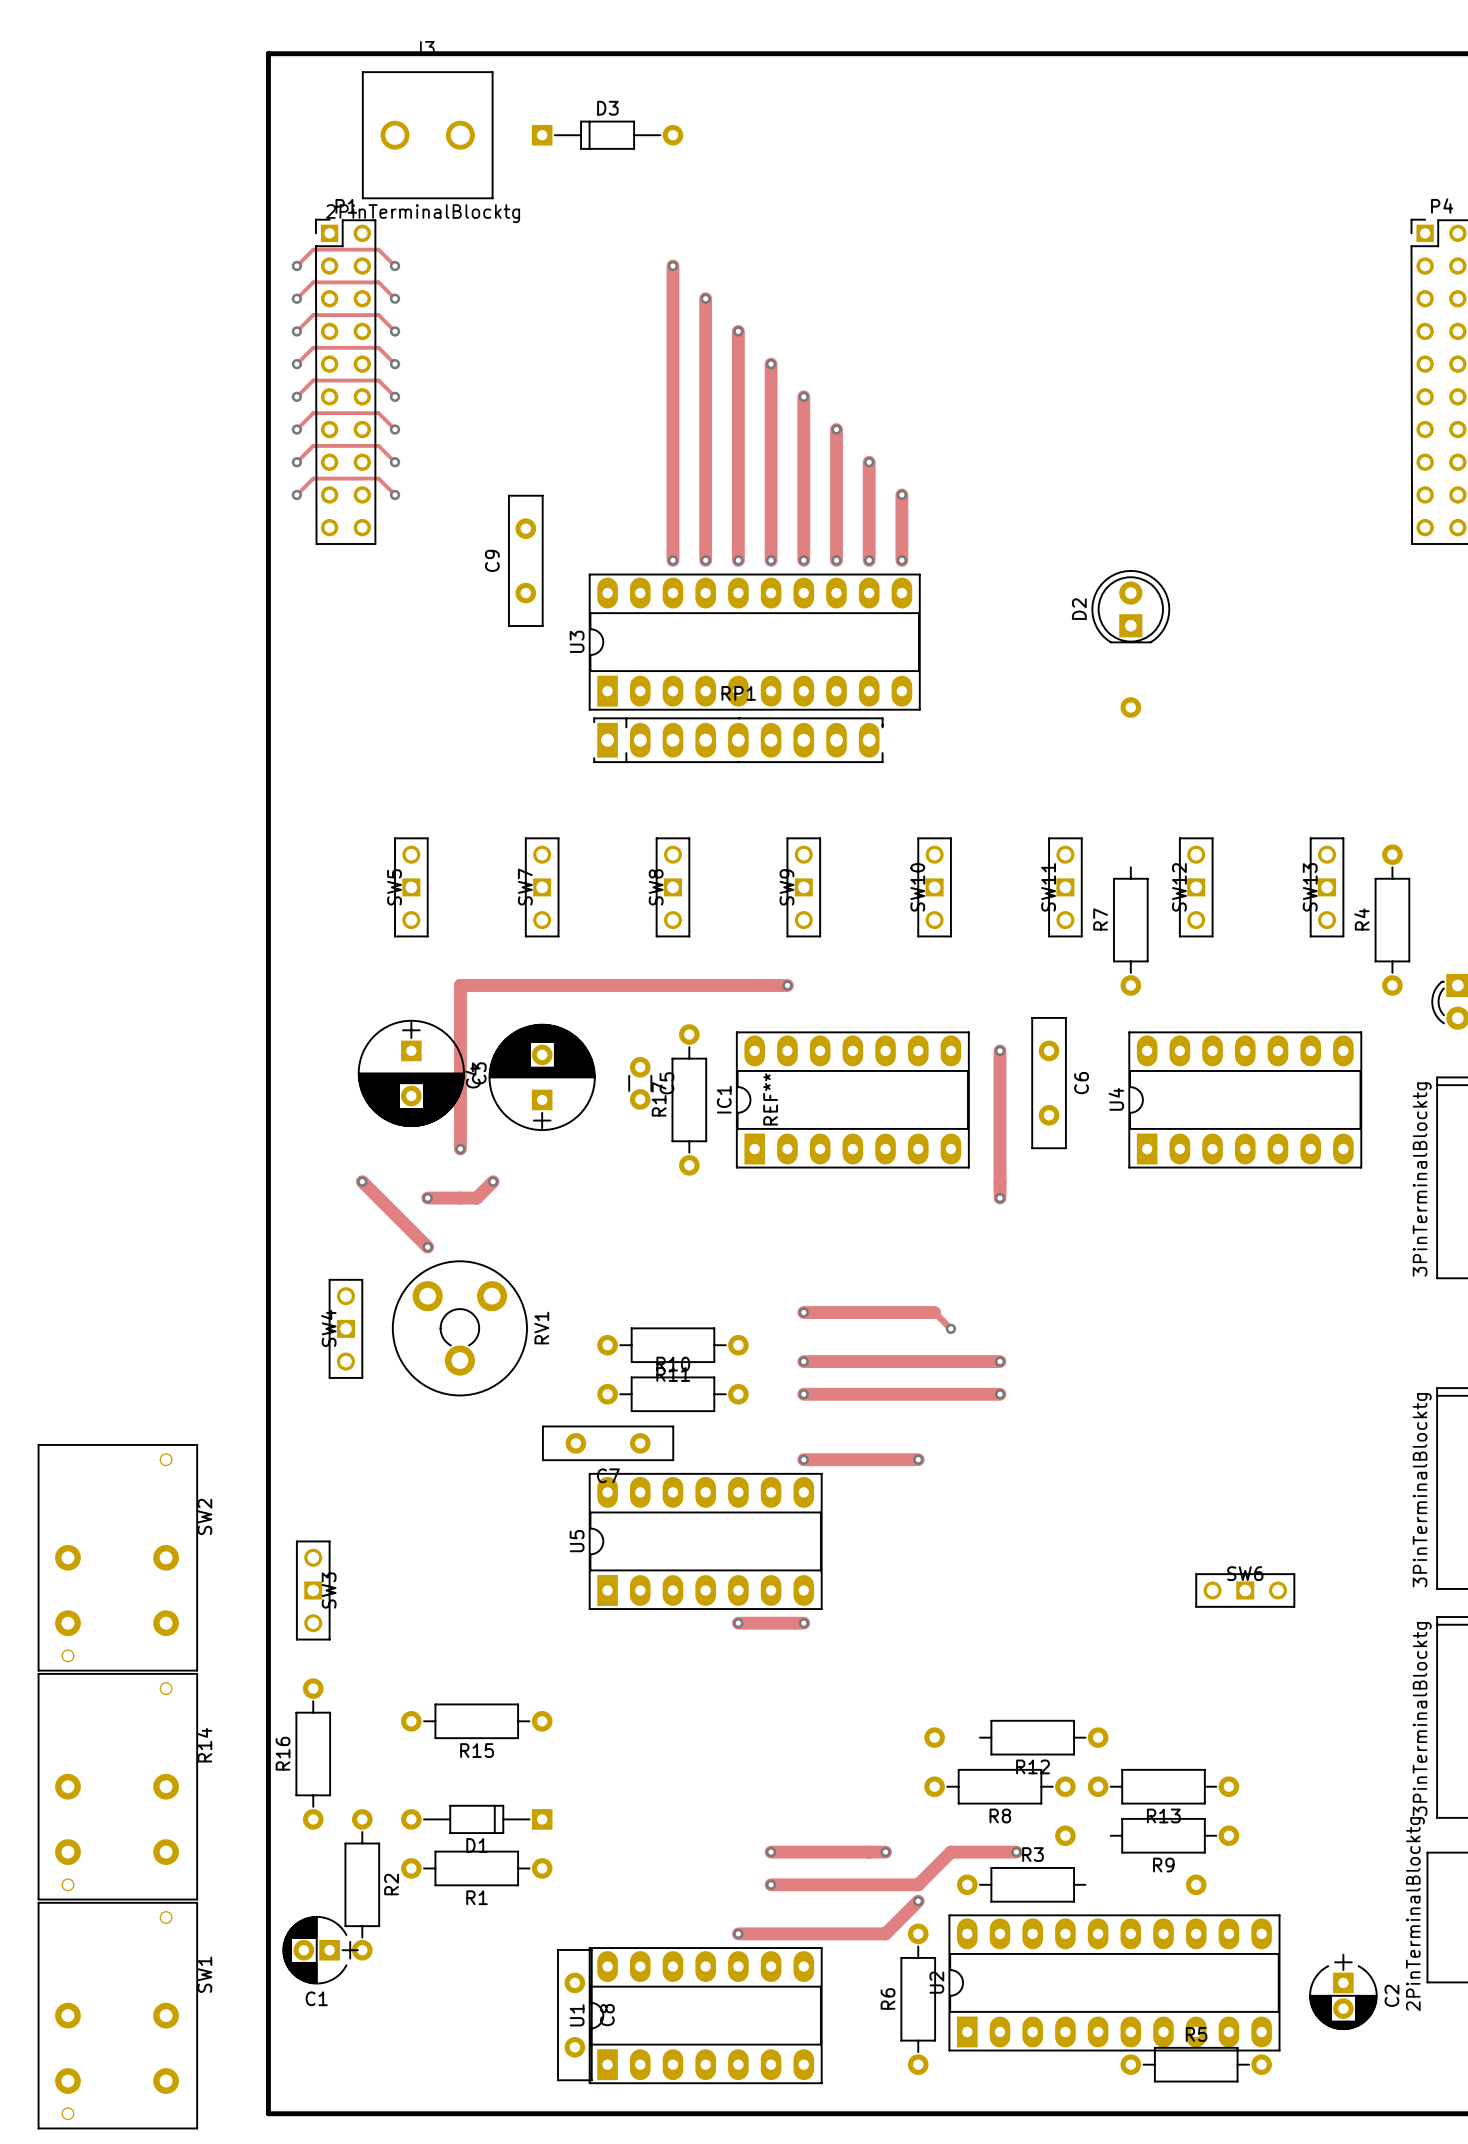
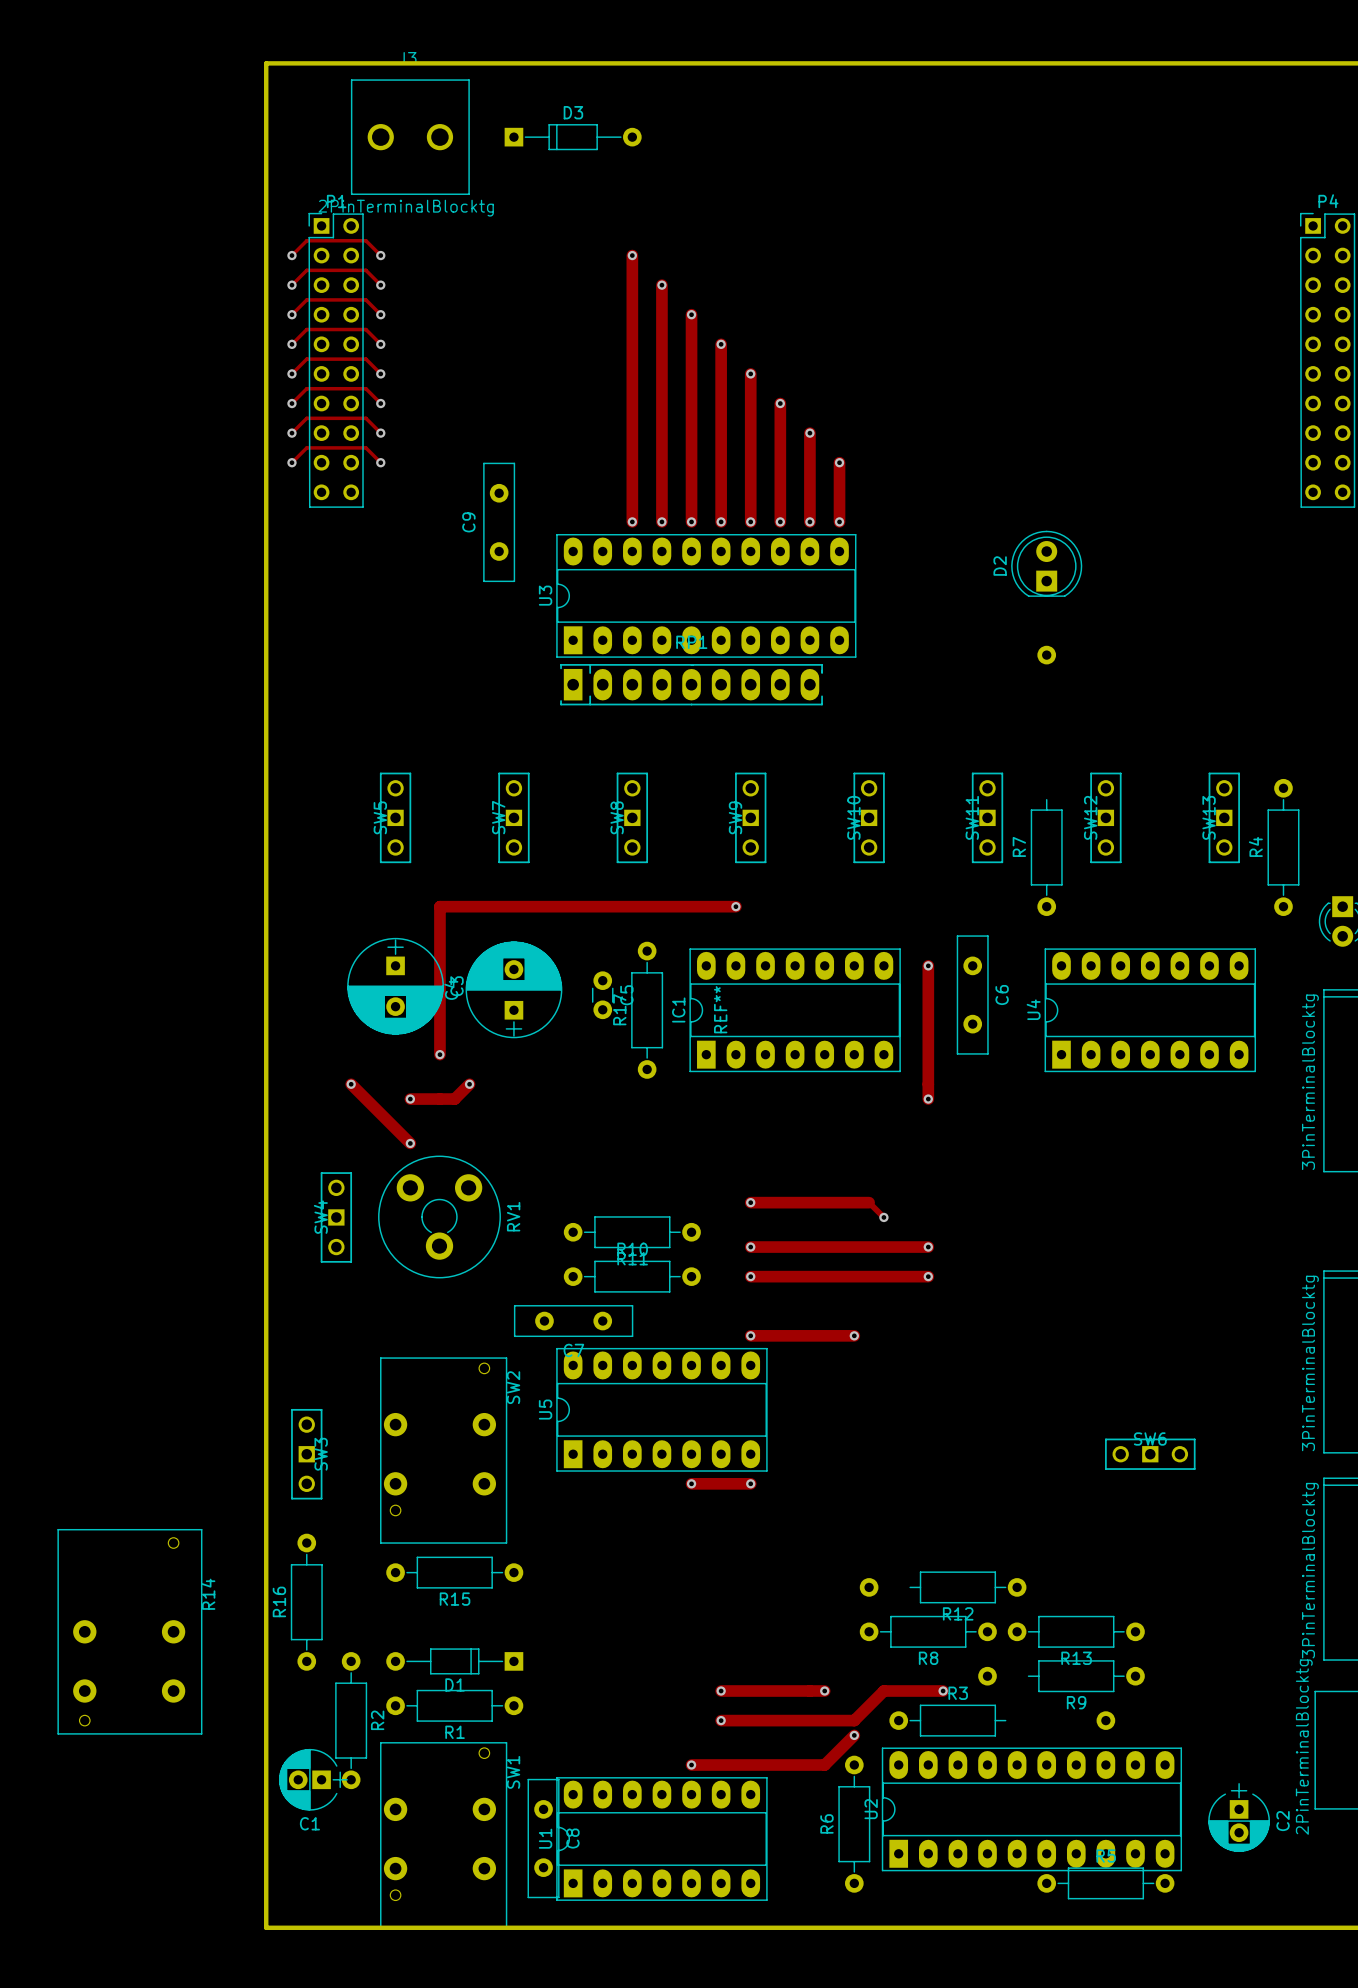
SW2 footprint: [37, 1444, 198, 1672] -> [380, 1357, 508, 1544]
SW2 name position: SW2 (204, 1516) -> SW2 (513, 1387)
SW1 footprint: [37, 1902, 198, 2130] -> [380, 1742, 508, 1929]
SW1 name position: SW1 (204, 1974) -> SW1 (513, 1772)

